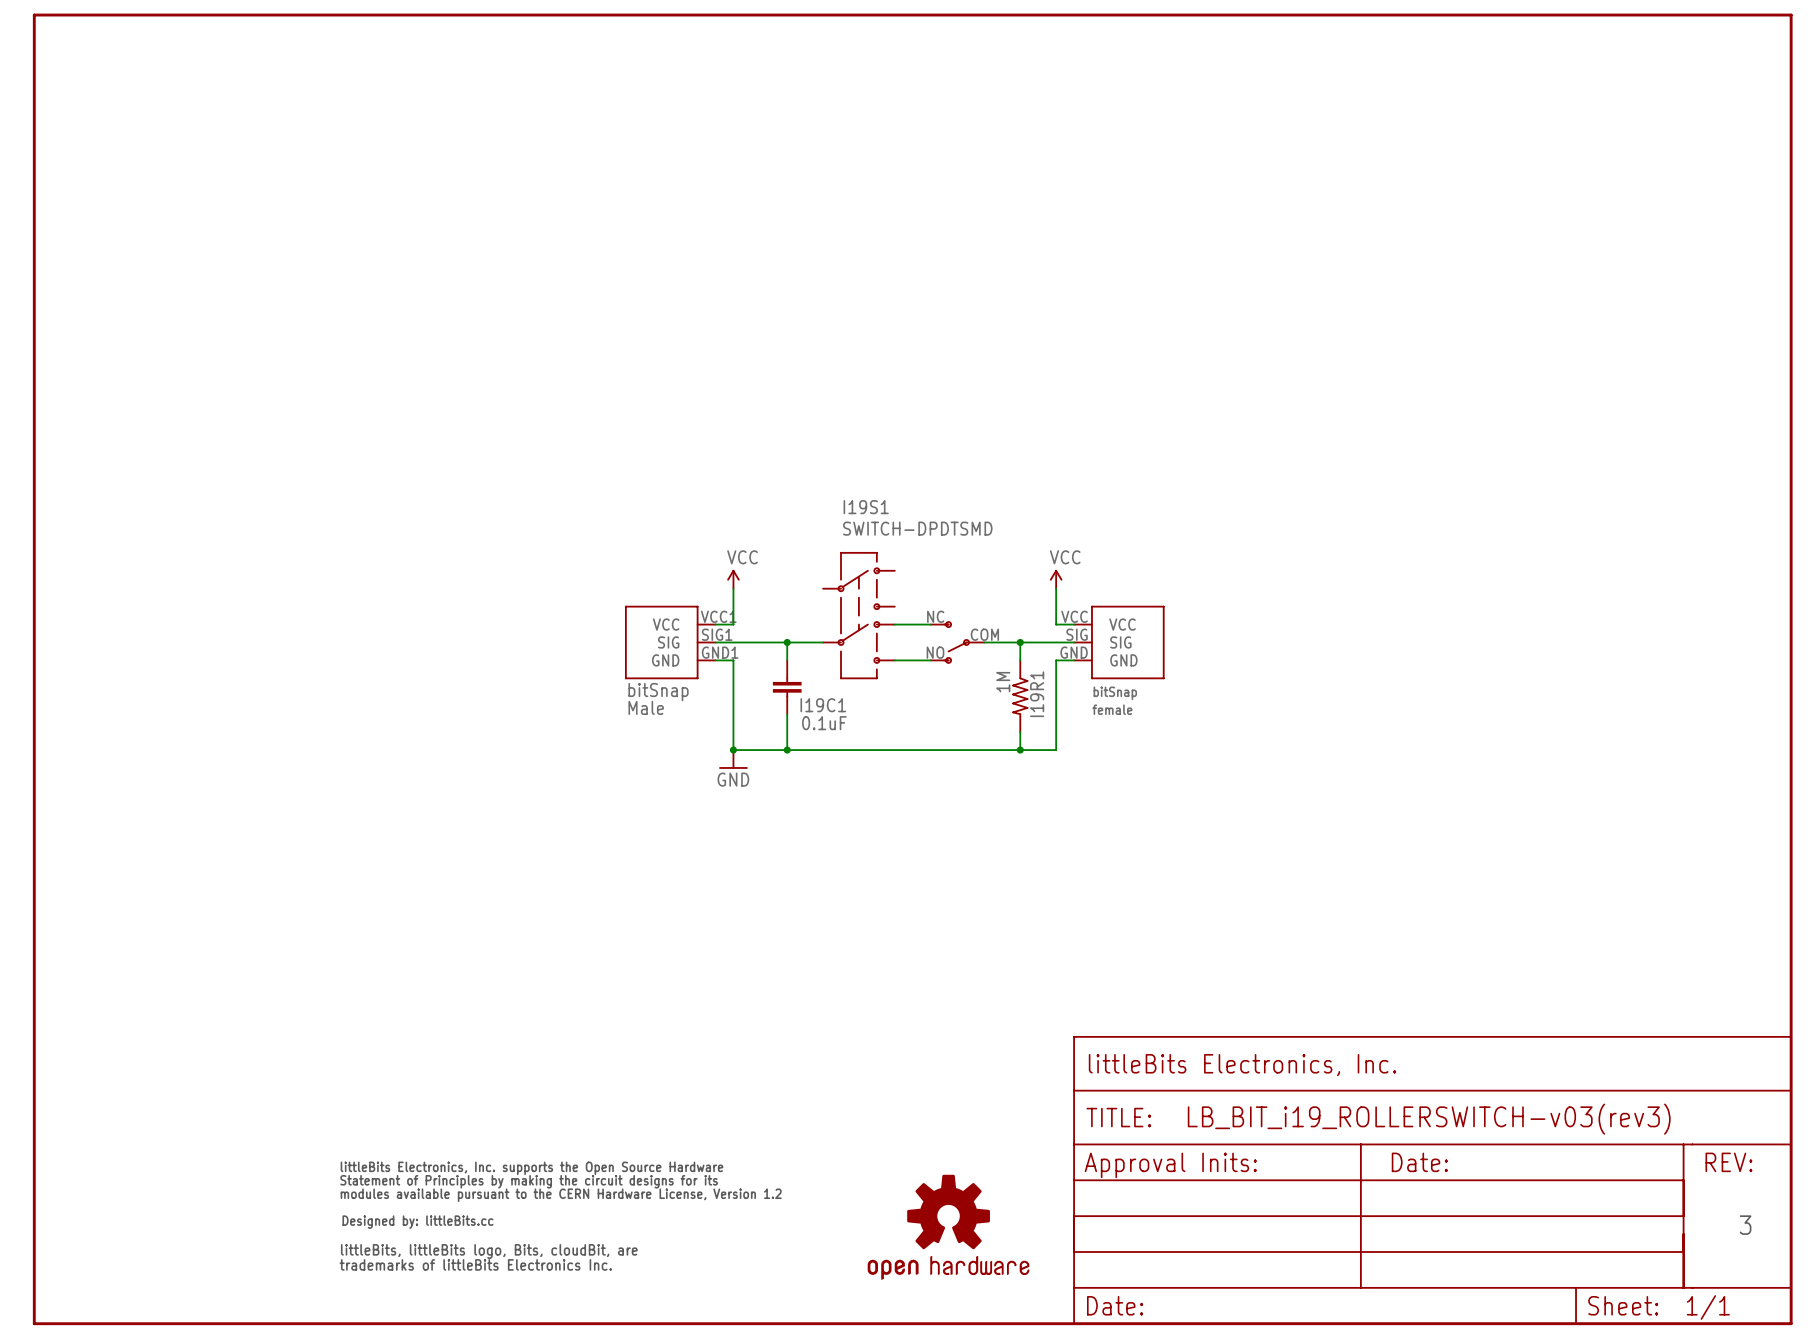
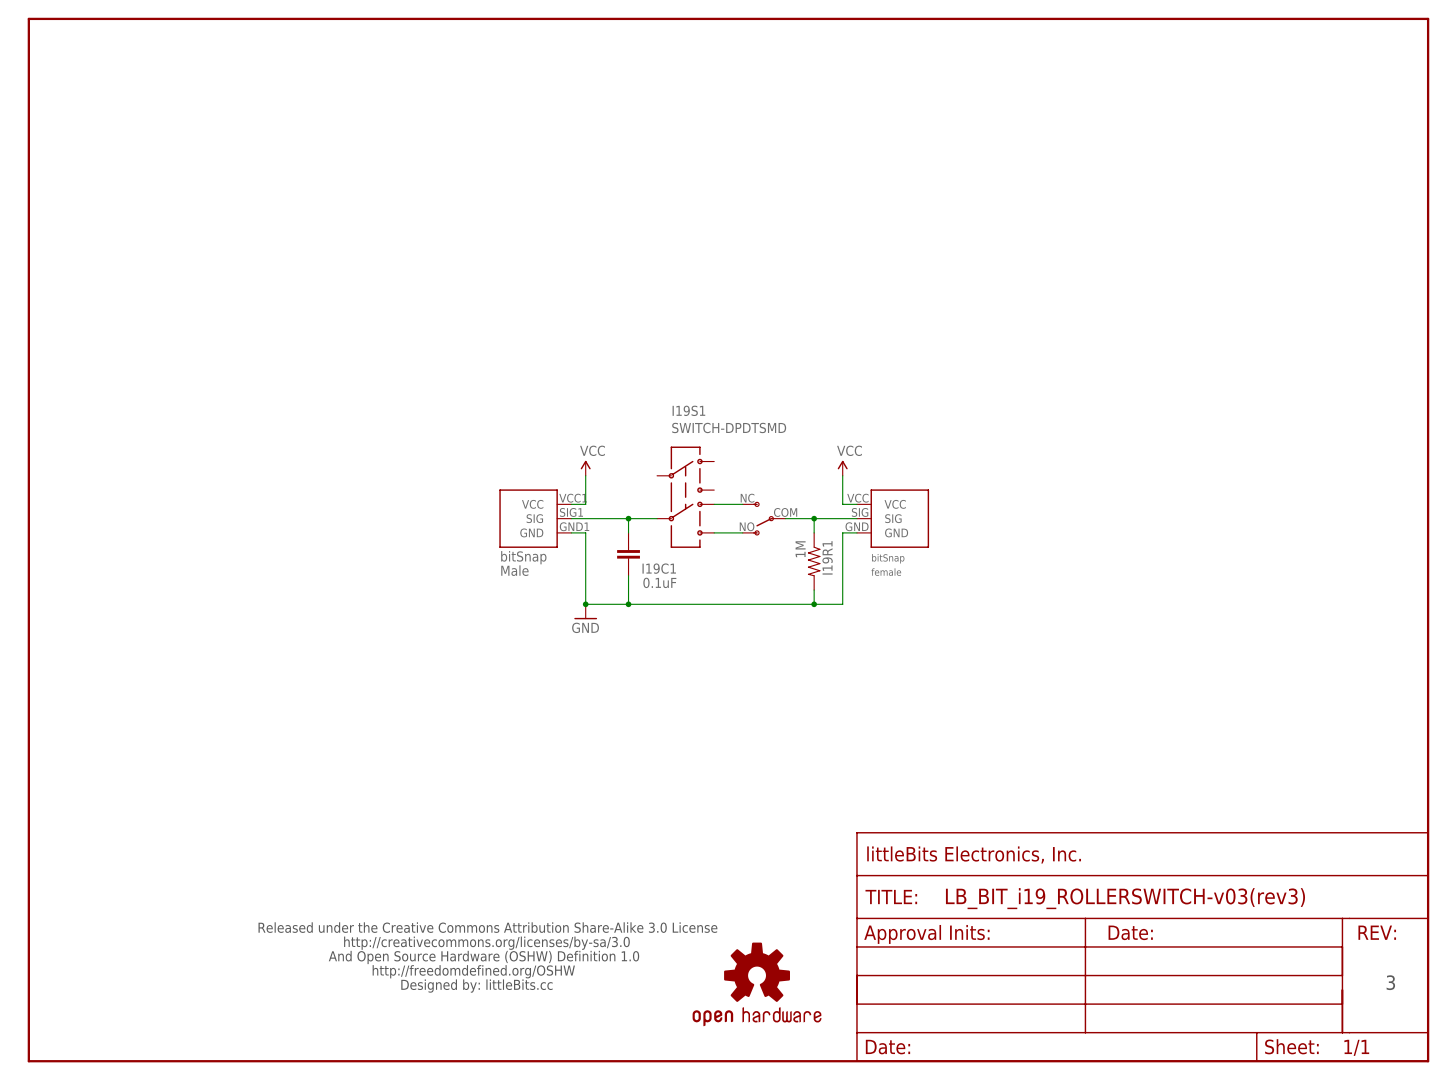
part: none -> (487, 957)
part: (560, 1216) -> none

